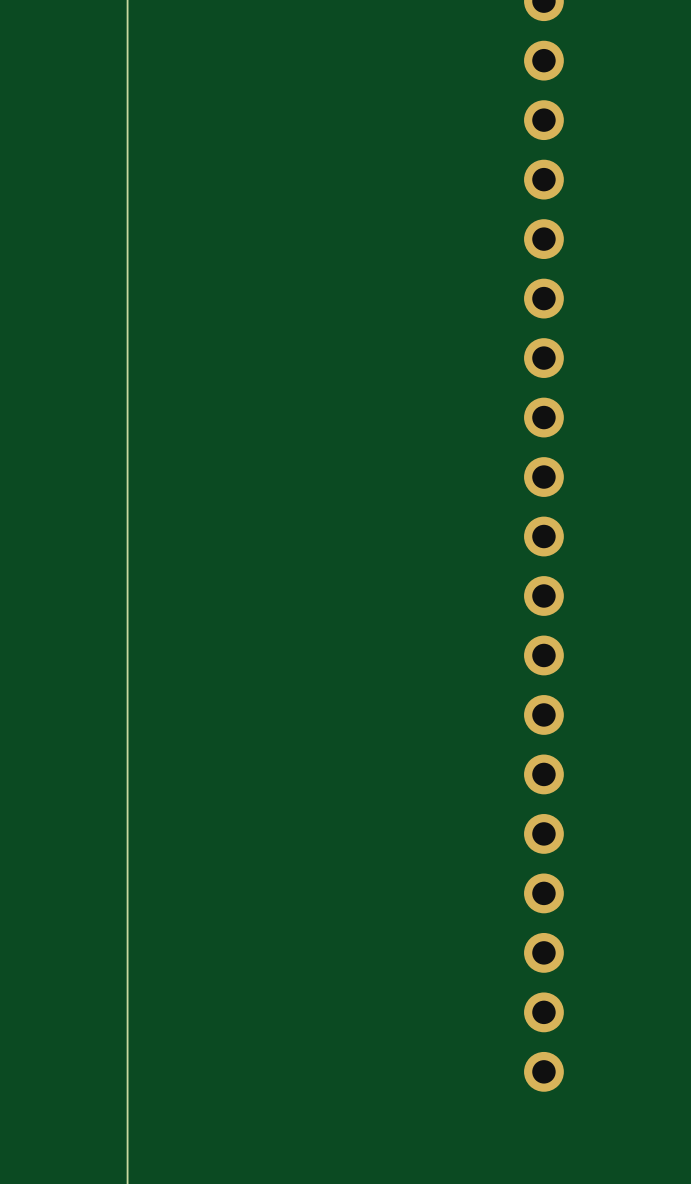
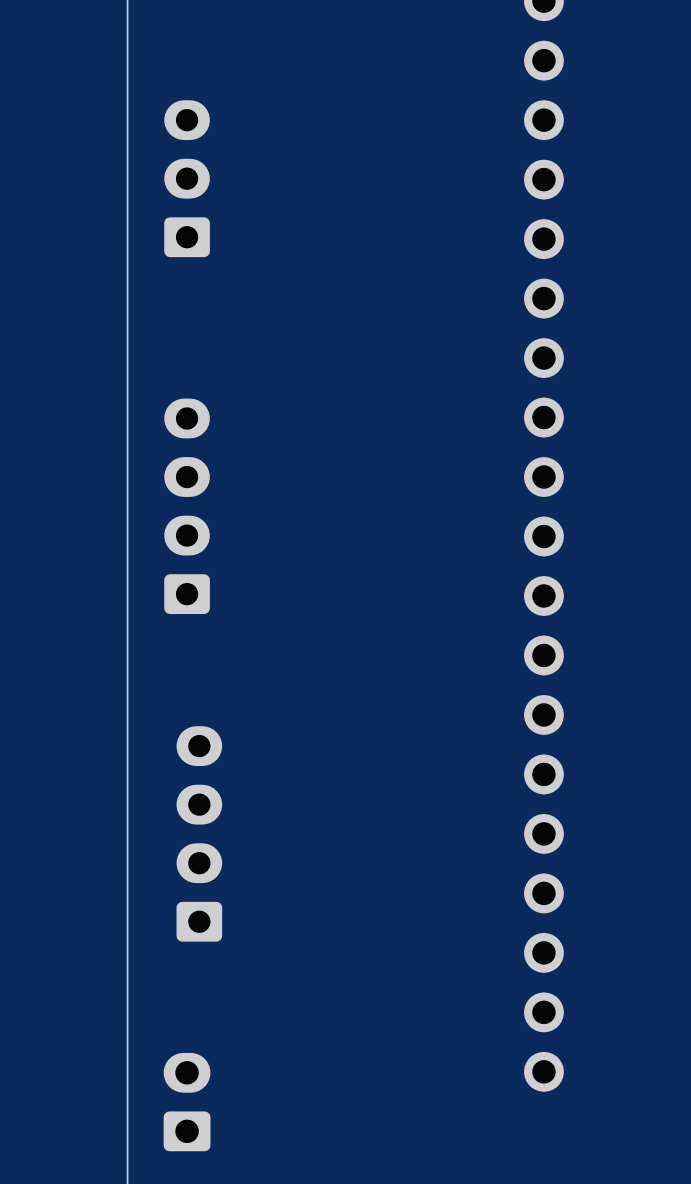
part: none -> (187, 178)
part: none -> (187, 506)
part: none -> (199, 833)
part: none -> (187, 1102)

